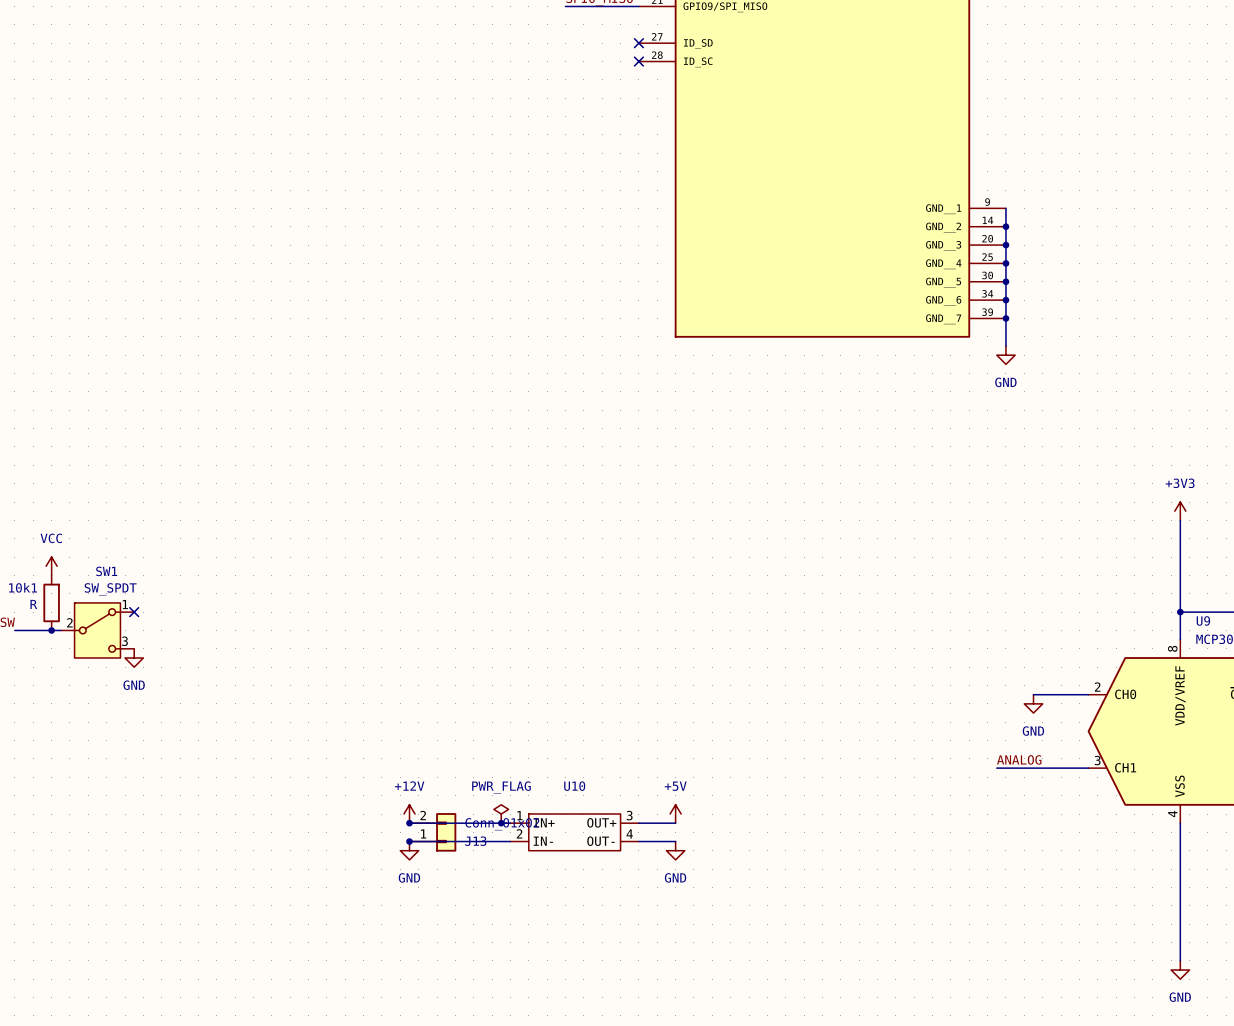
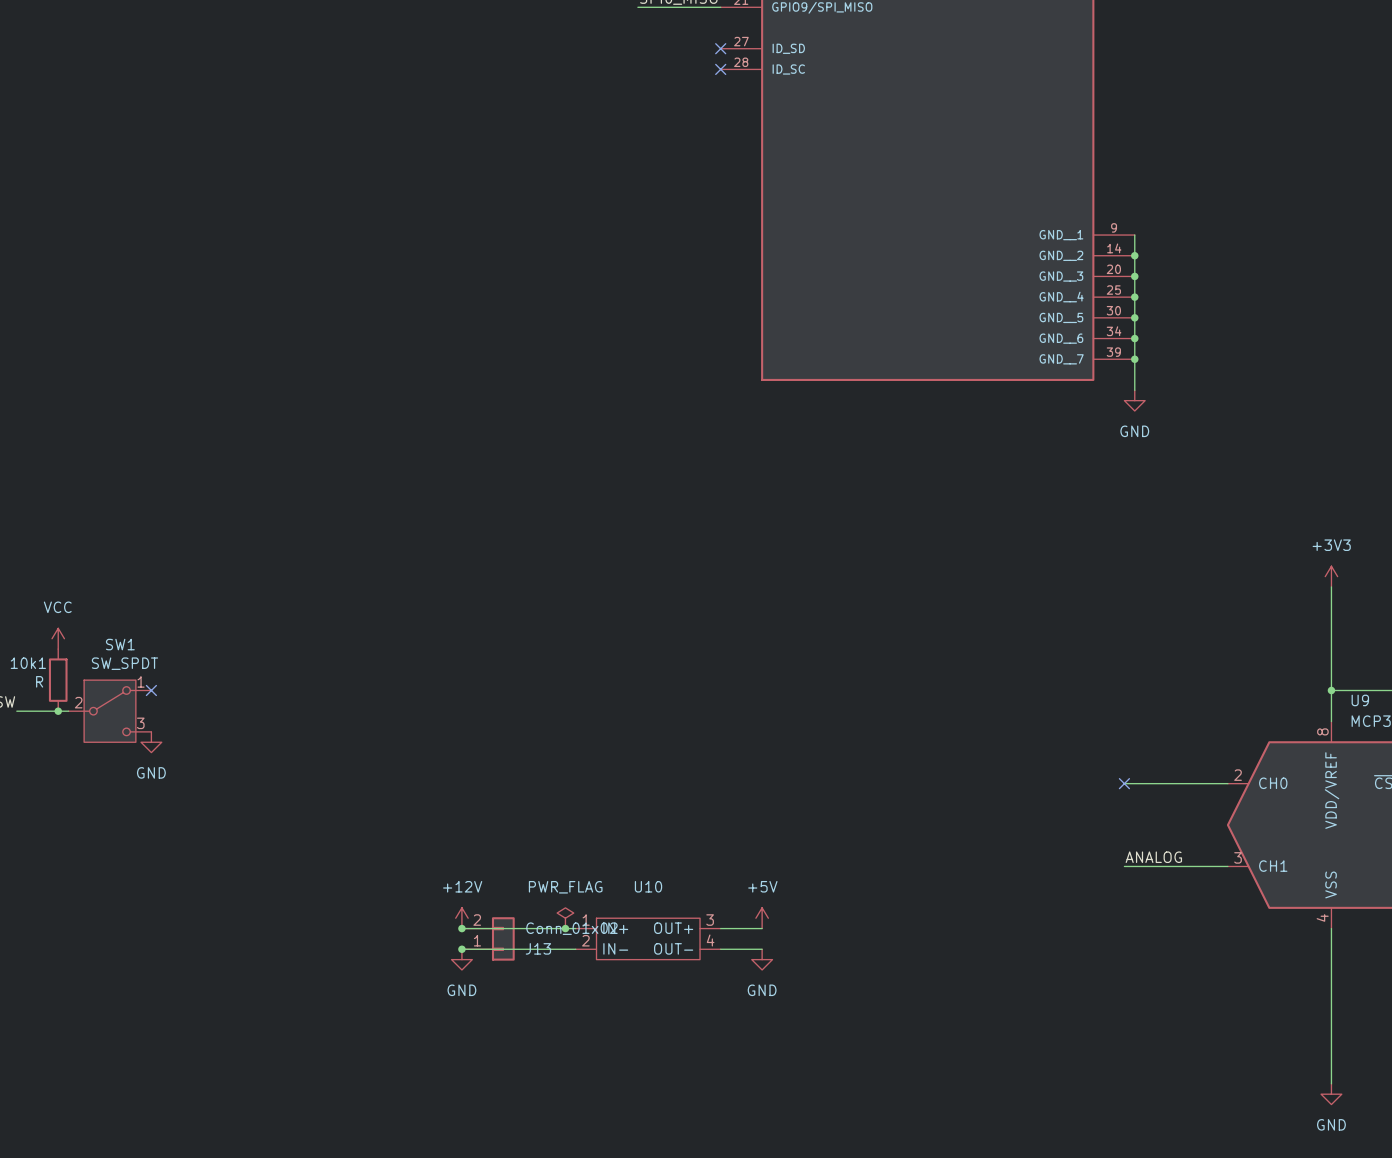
wire: none -> (1124, 783) (1165, 783)
no-connect mark: none -> (1124, 783)
power symbol: GND (1033, 703) -> none

